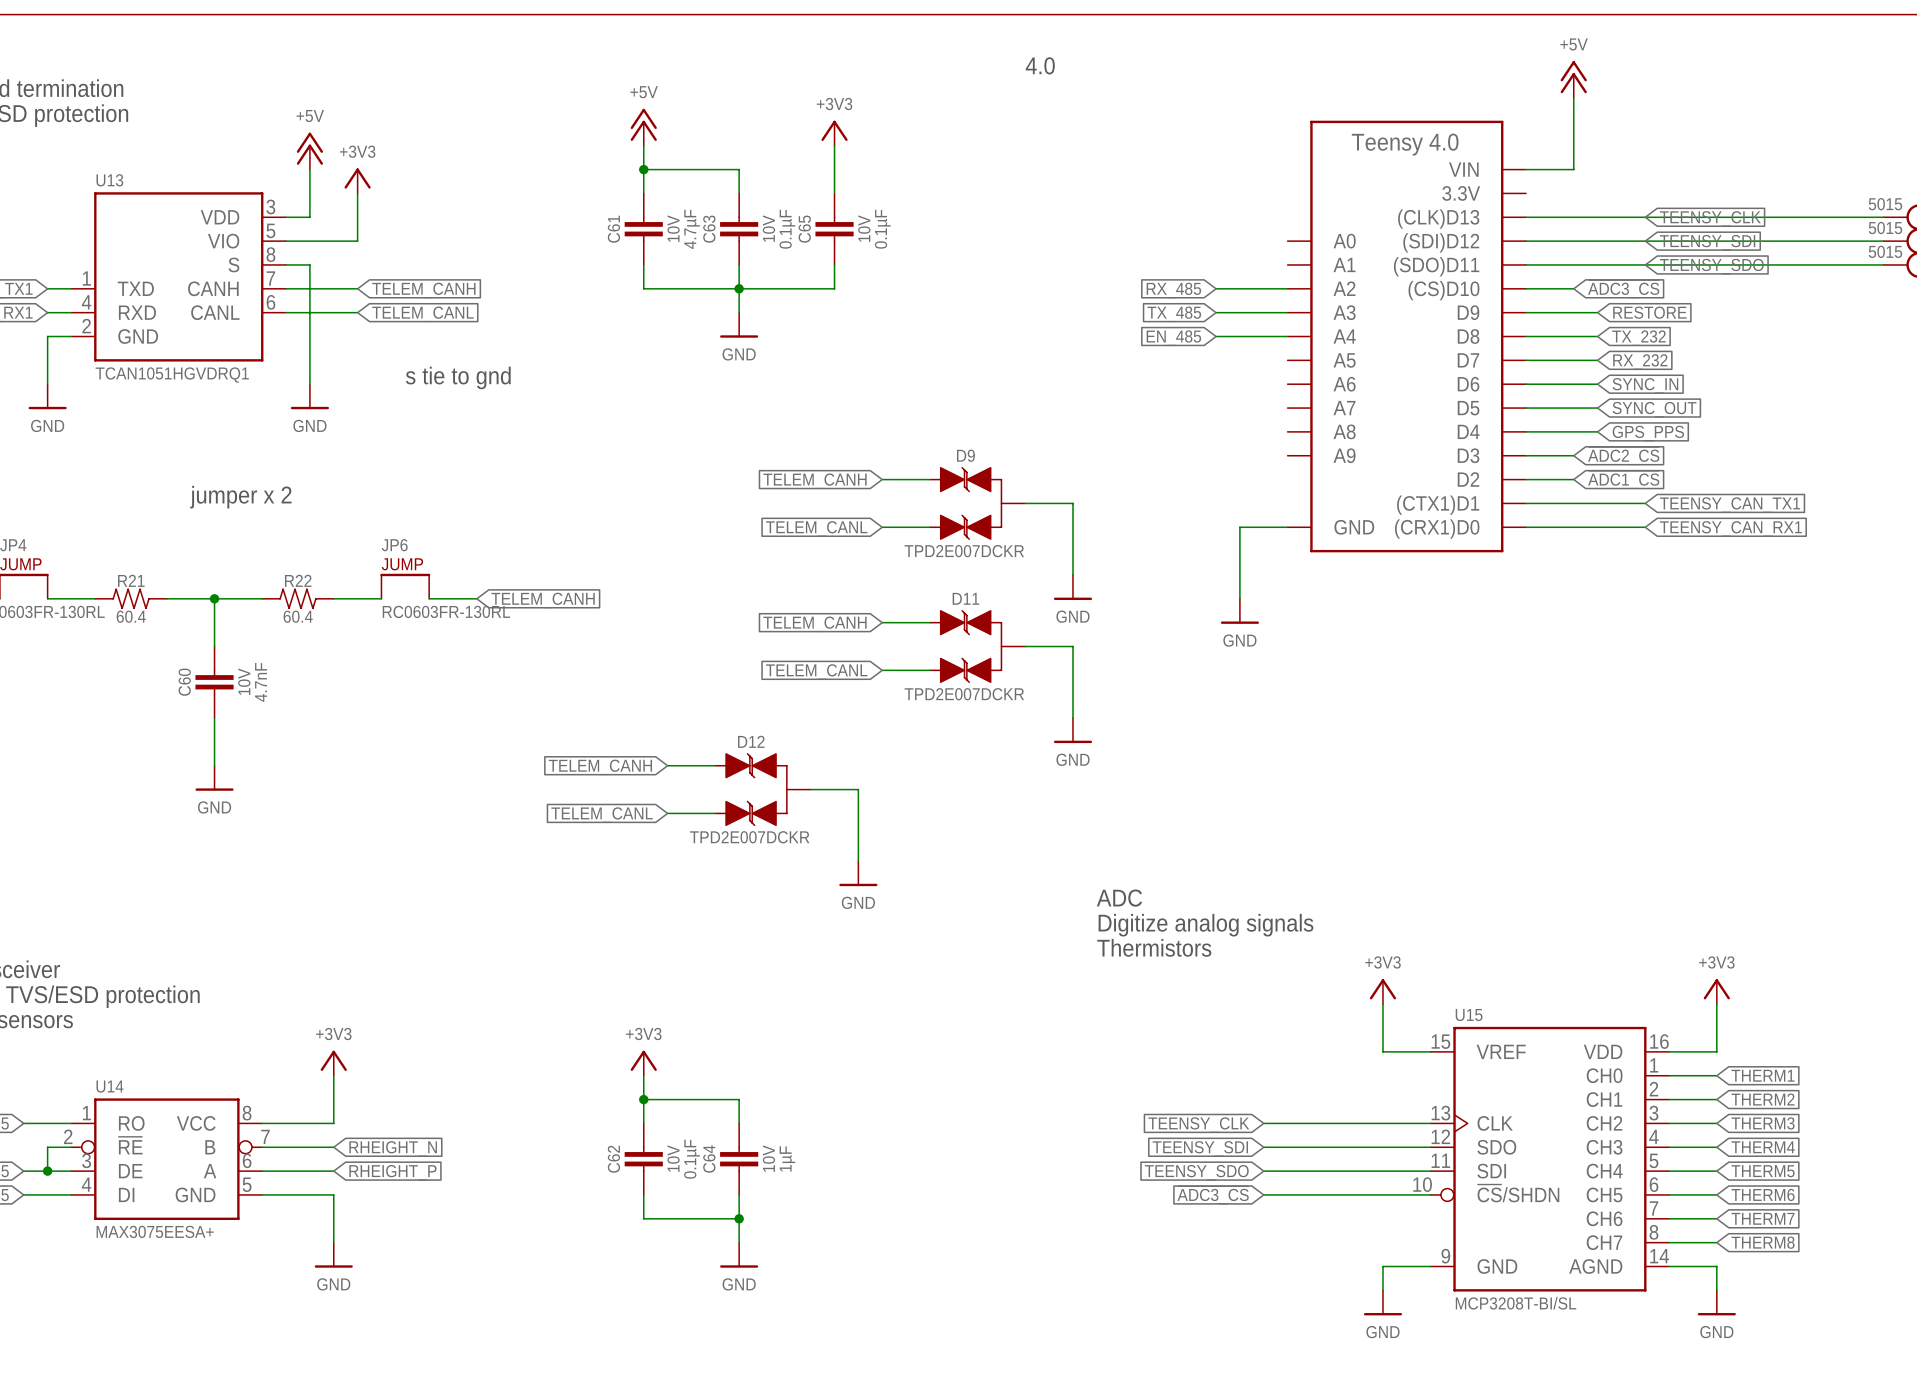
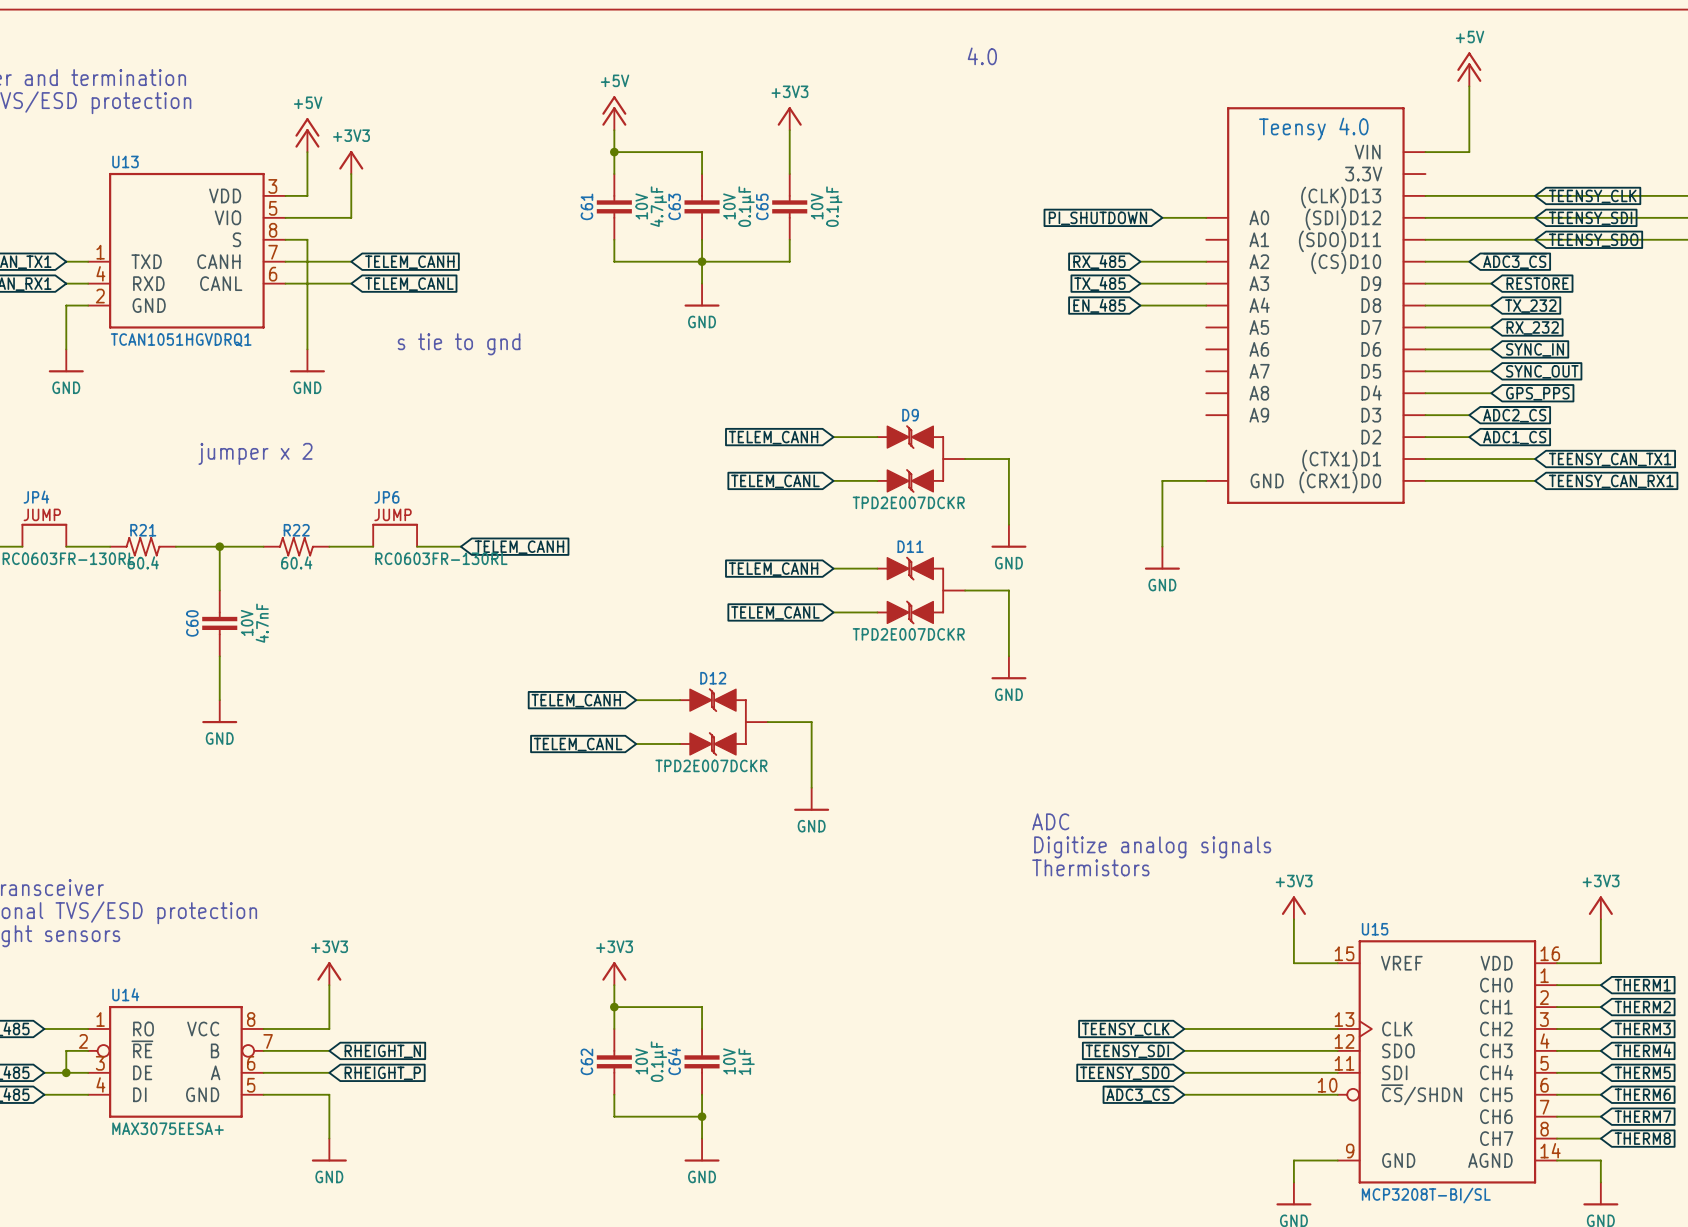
wire: none -> (1162, 217) (1206, 217)
global label: none -> PI_SHUTDOWN (1097, 218)

